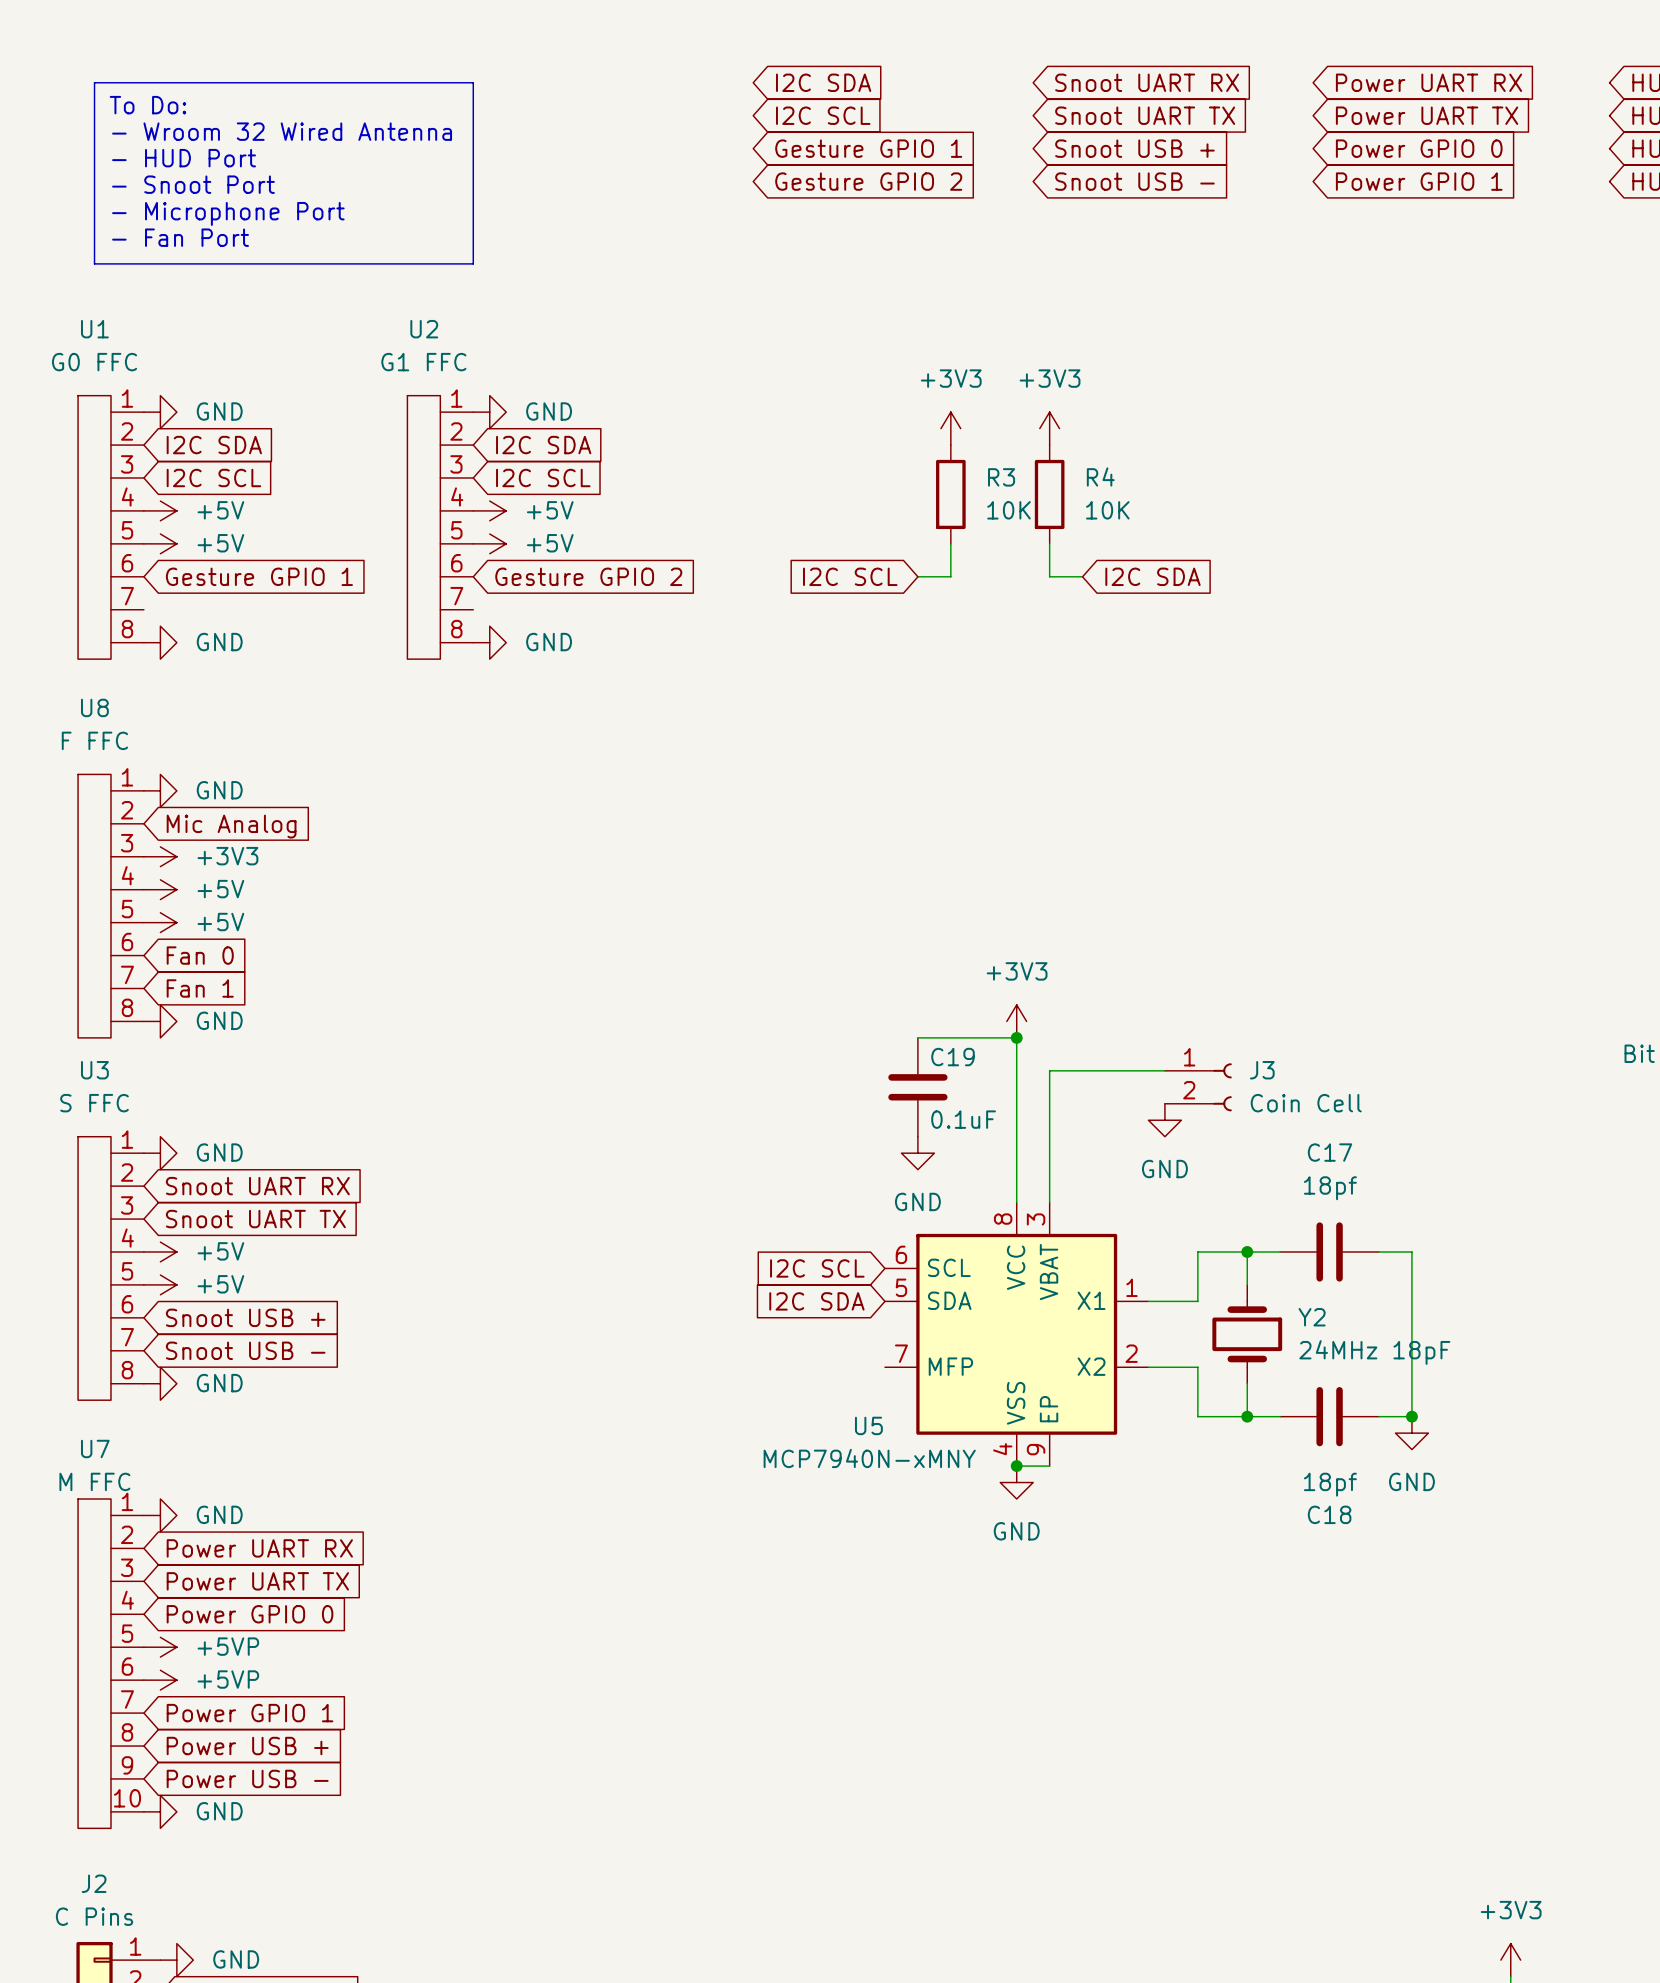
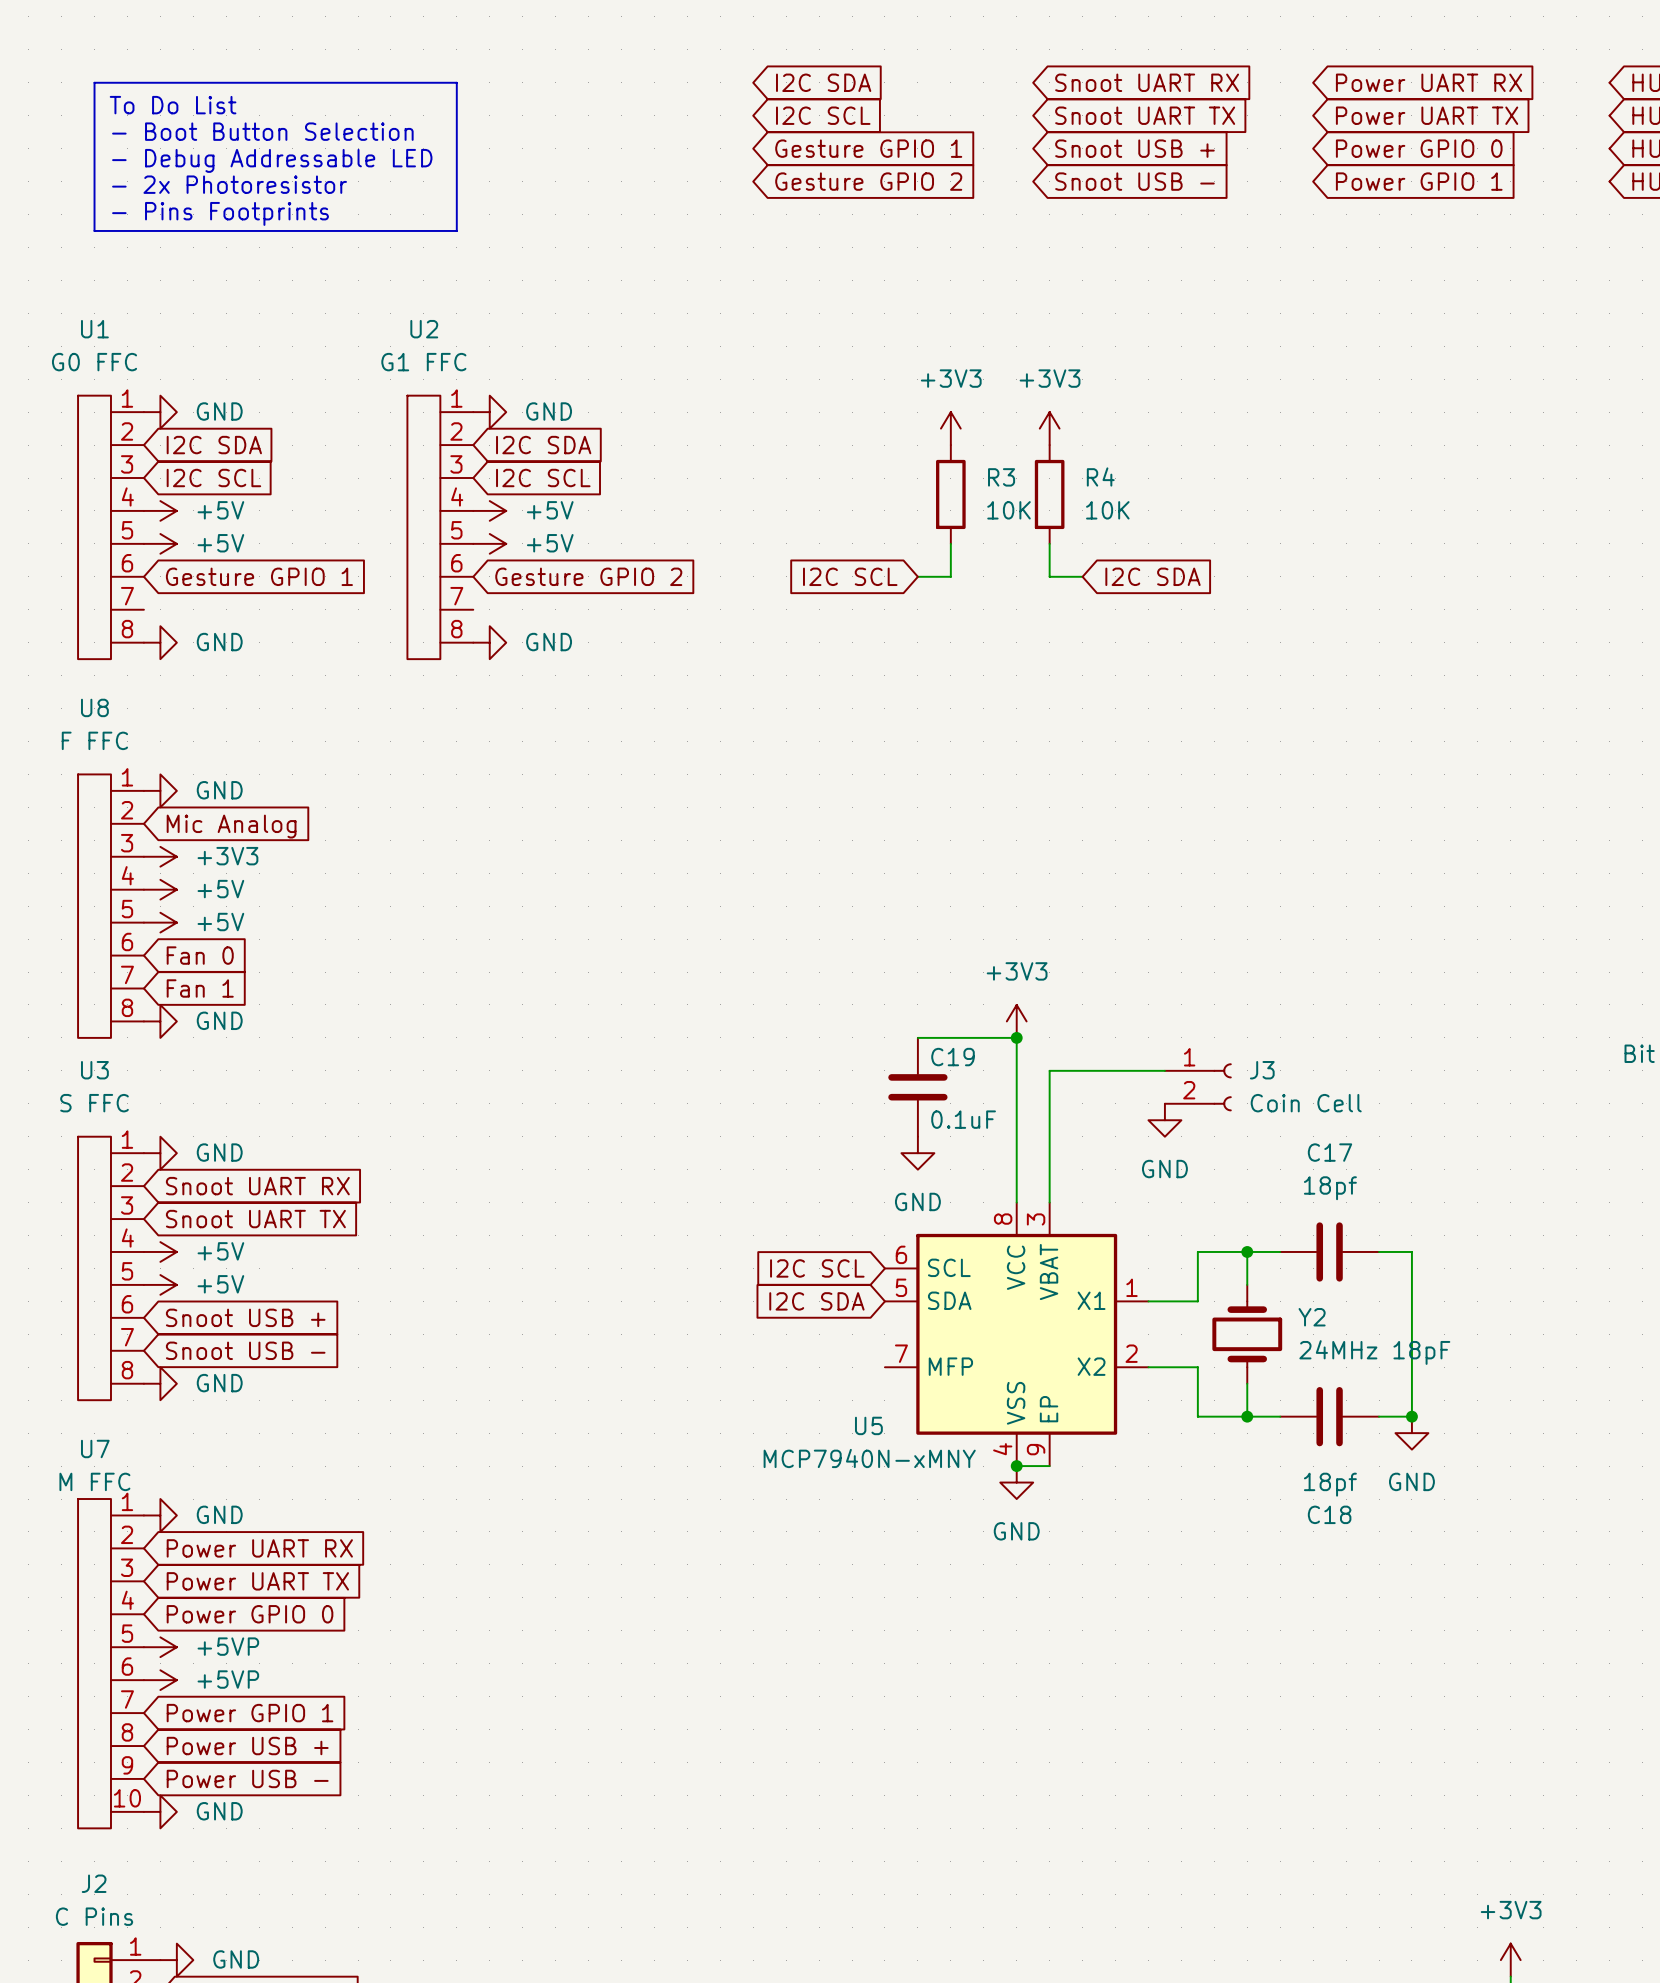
line: (456, 82) (473, 82) (473, 263) (94, 263) (94, 230) -> (456, 82) (456, 230) (94, 230)
text: To Do: (147, 105) -> To Do List (173, 105)
text: - Wroom 32 Wired Antenna (282, 131) -> - Boot Button Selection (262, 131)
text: - HUD Port (184, 158) -> - Debug Addressable LED (272, 160)
text: - Snoot Port (193, 184) -> - 2x Photoresistor (229, 184)
text: - Microphone Port (228, 213) -> - Pins Footprints (220, 213)
text: - Fan Port (180, 237) -> none

